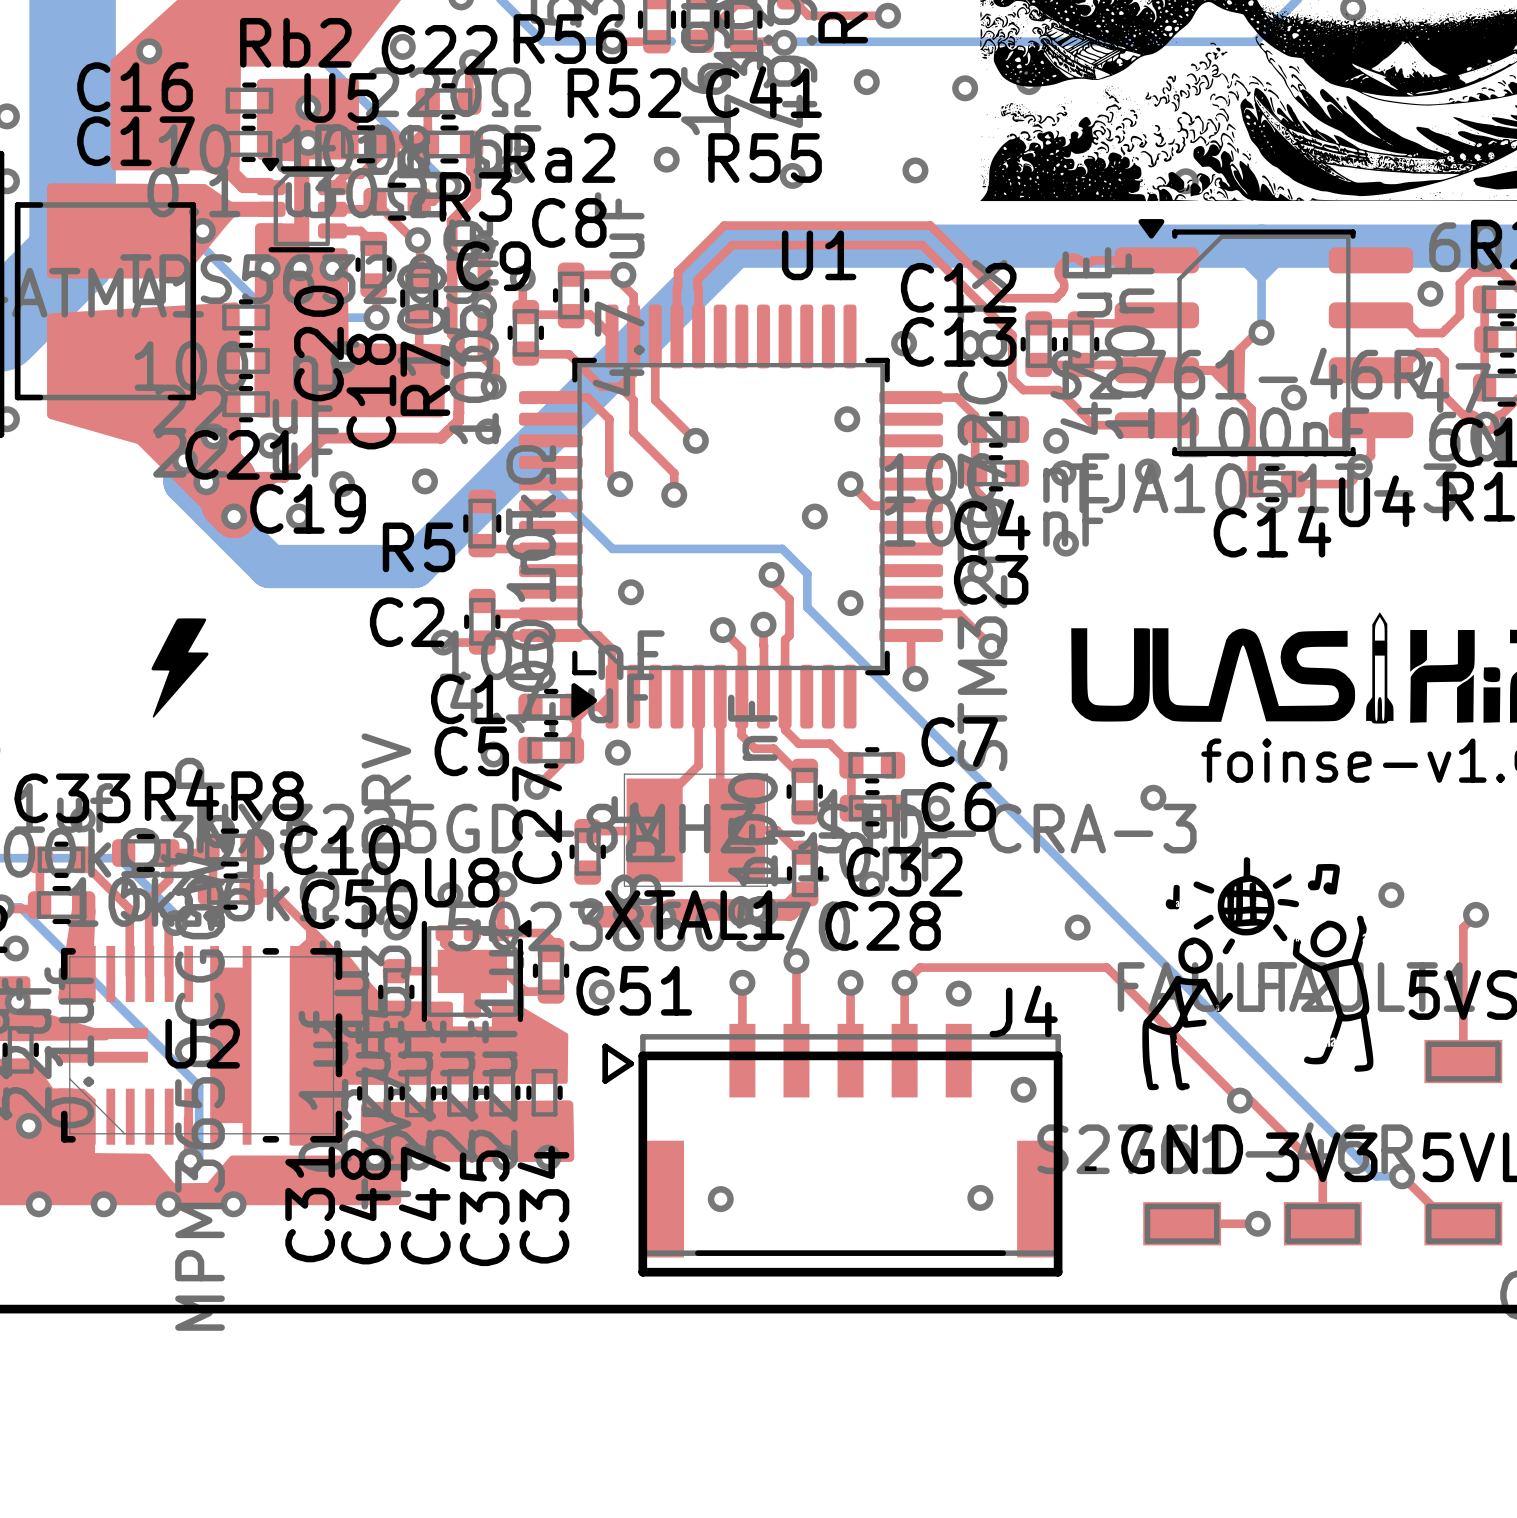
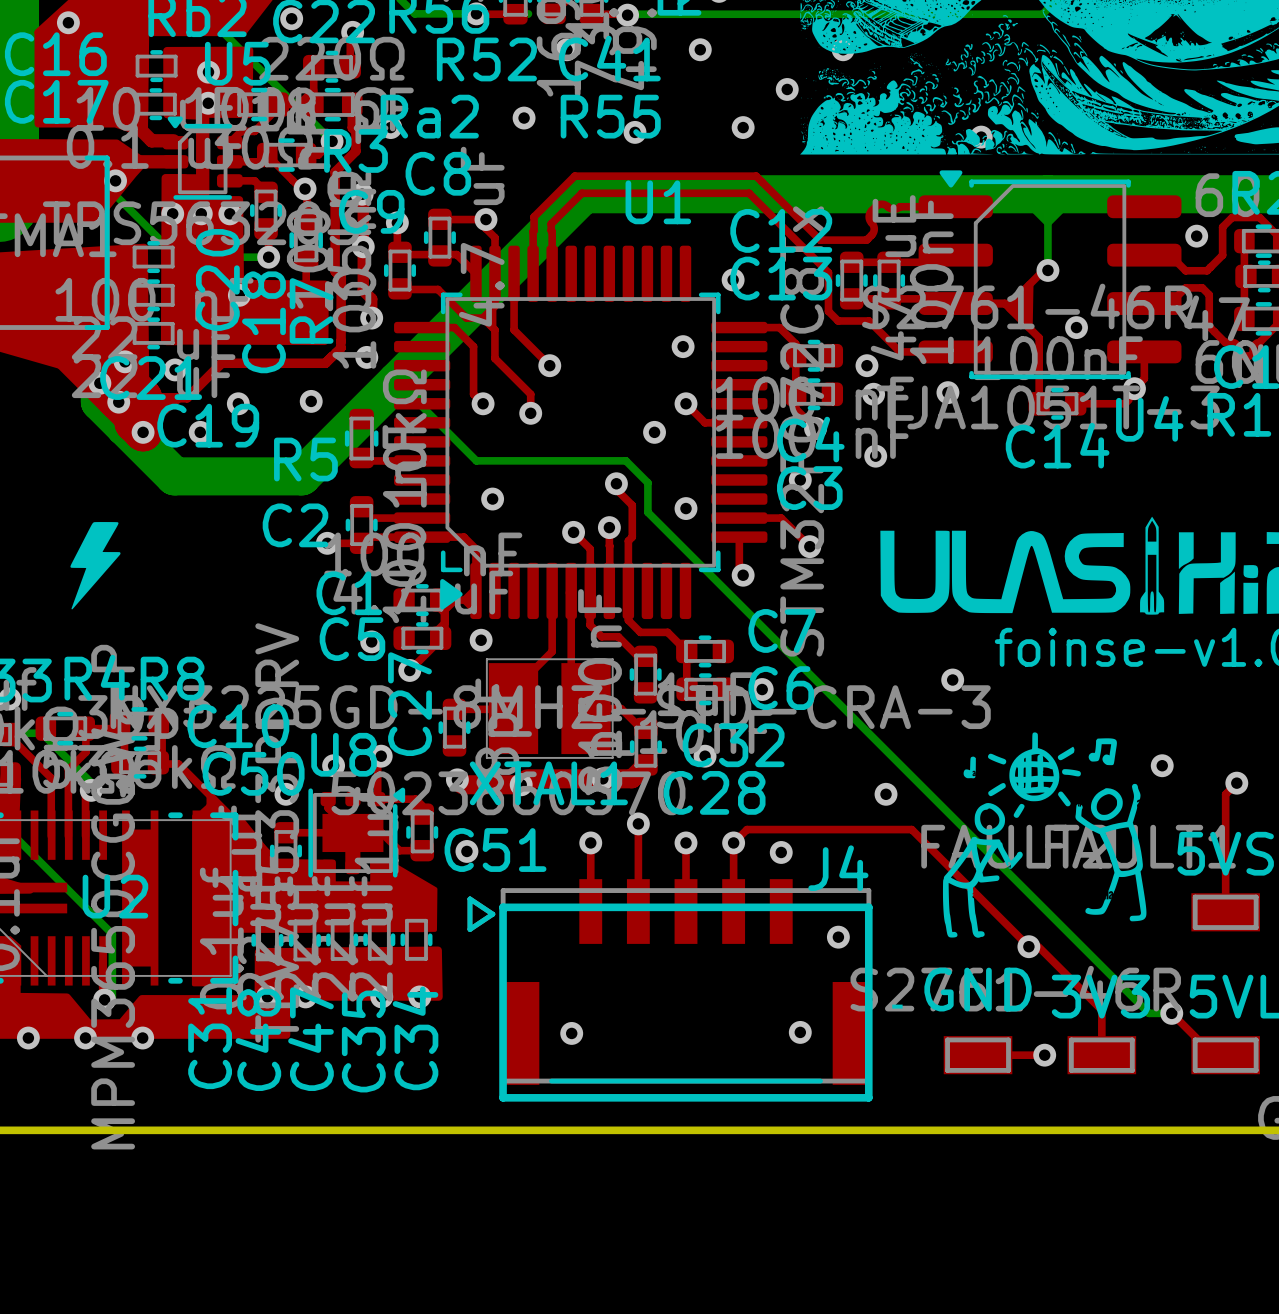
via position: (965, 88) -> (787, 89)

